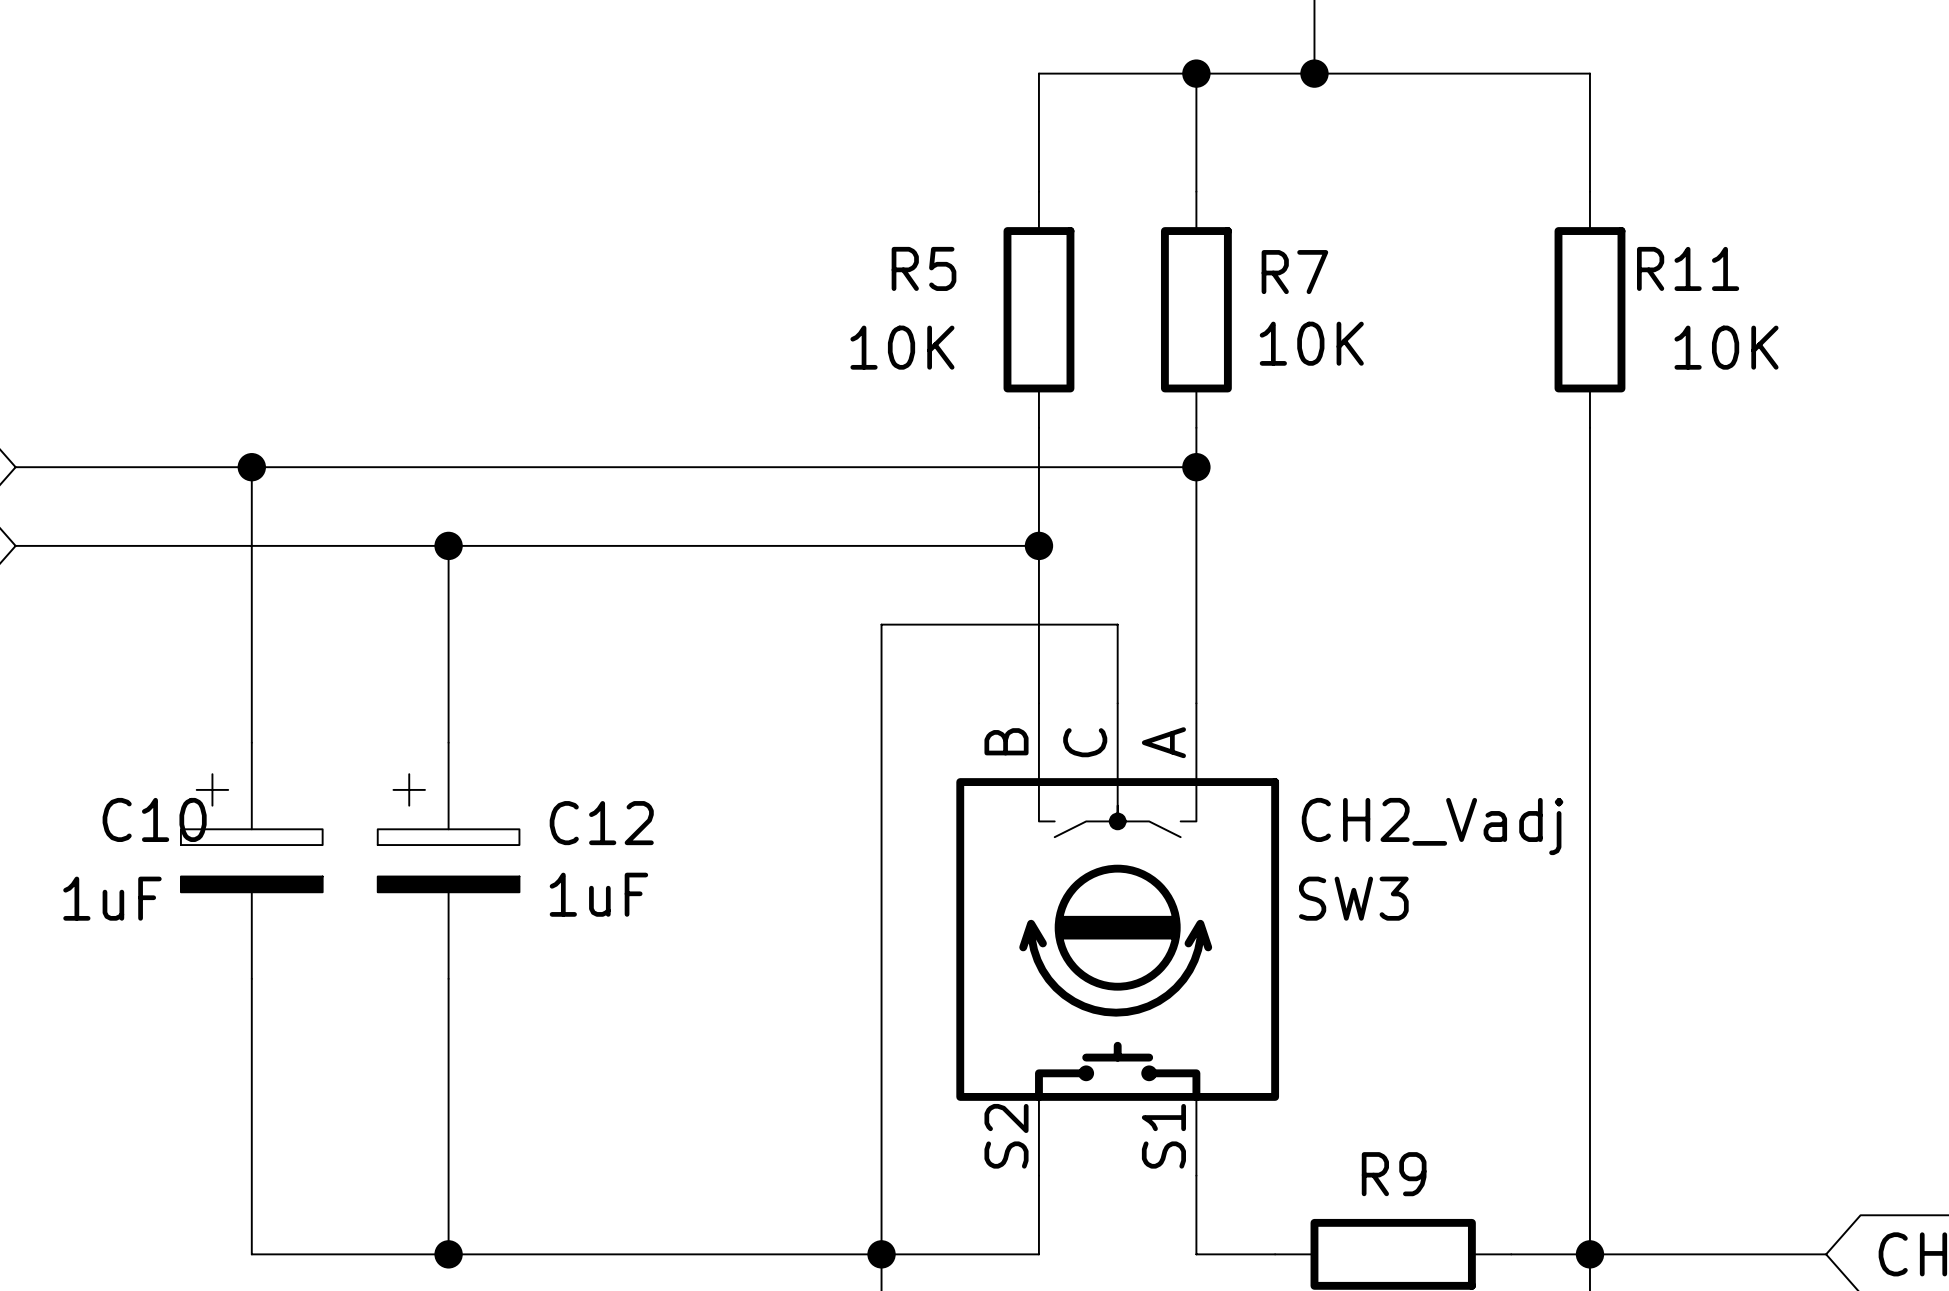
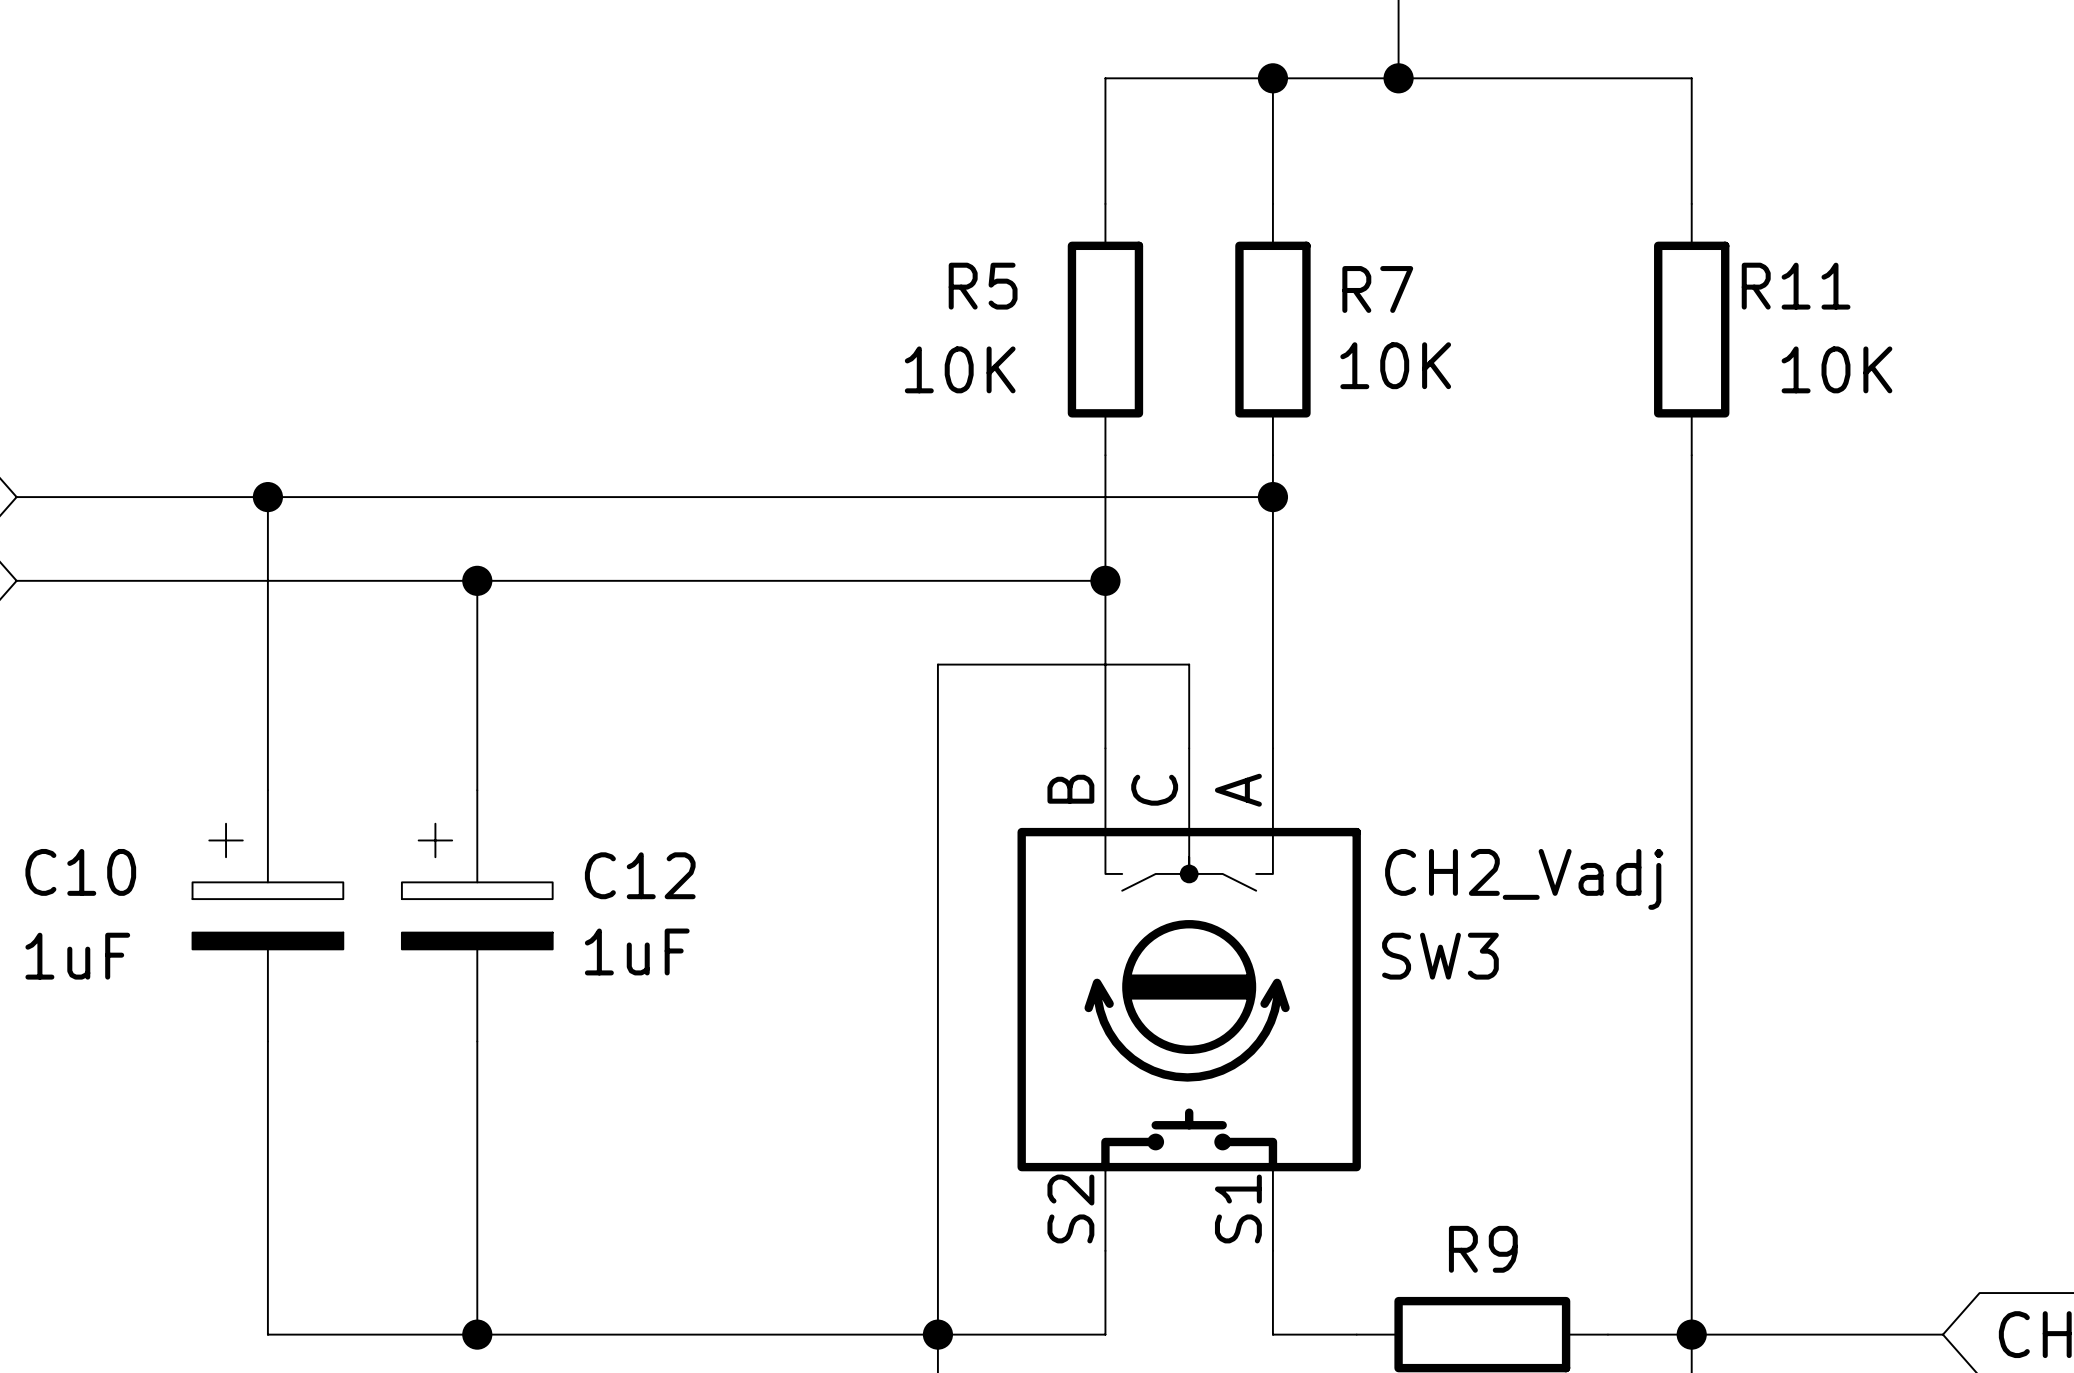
C10 name position: C10 (154, 819) -> C10 (80, 872)
C10 value position: 1uF (112, 898) -> 1uF (77, 956)

